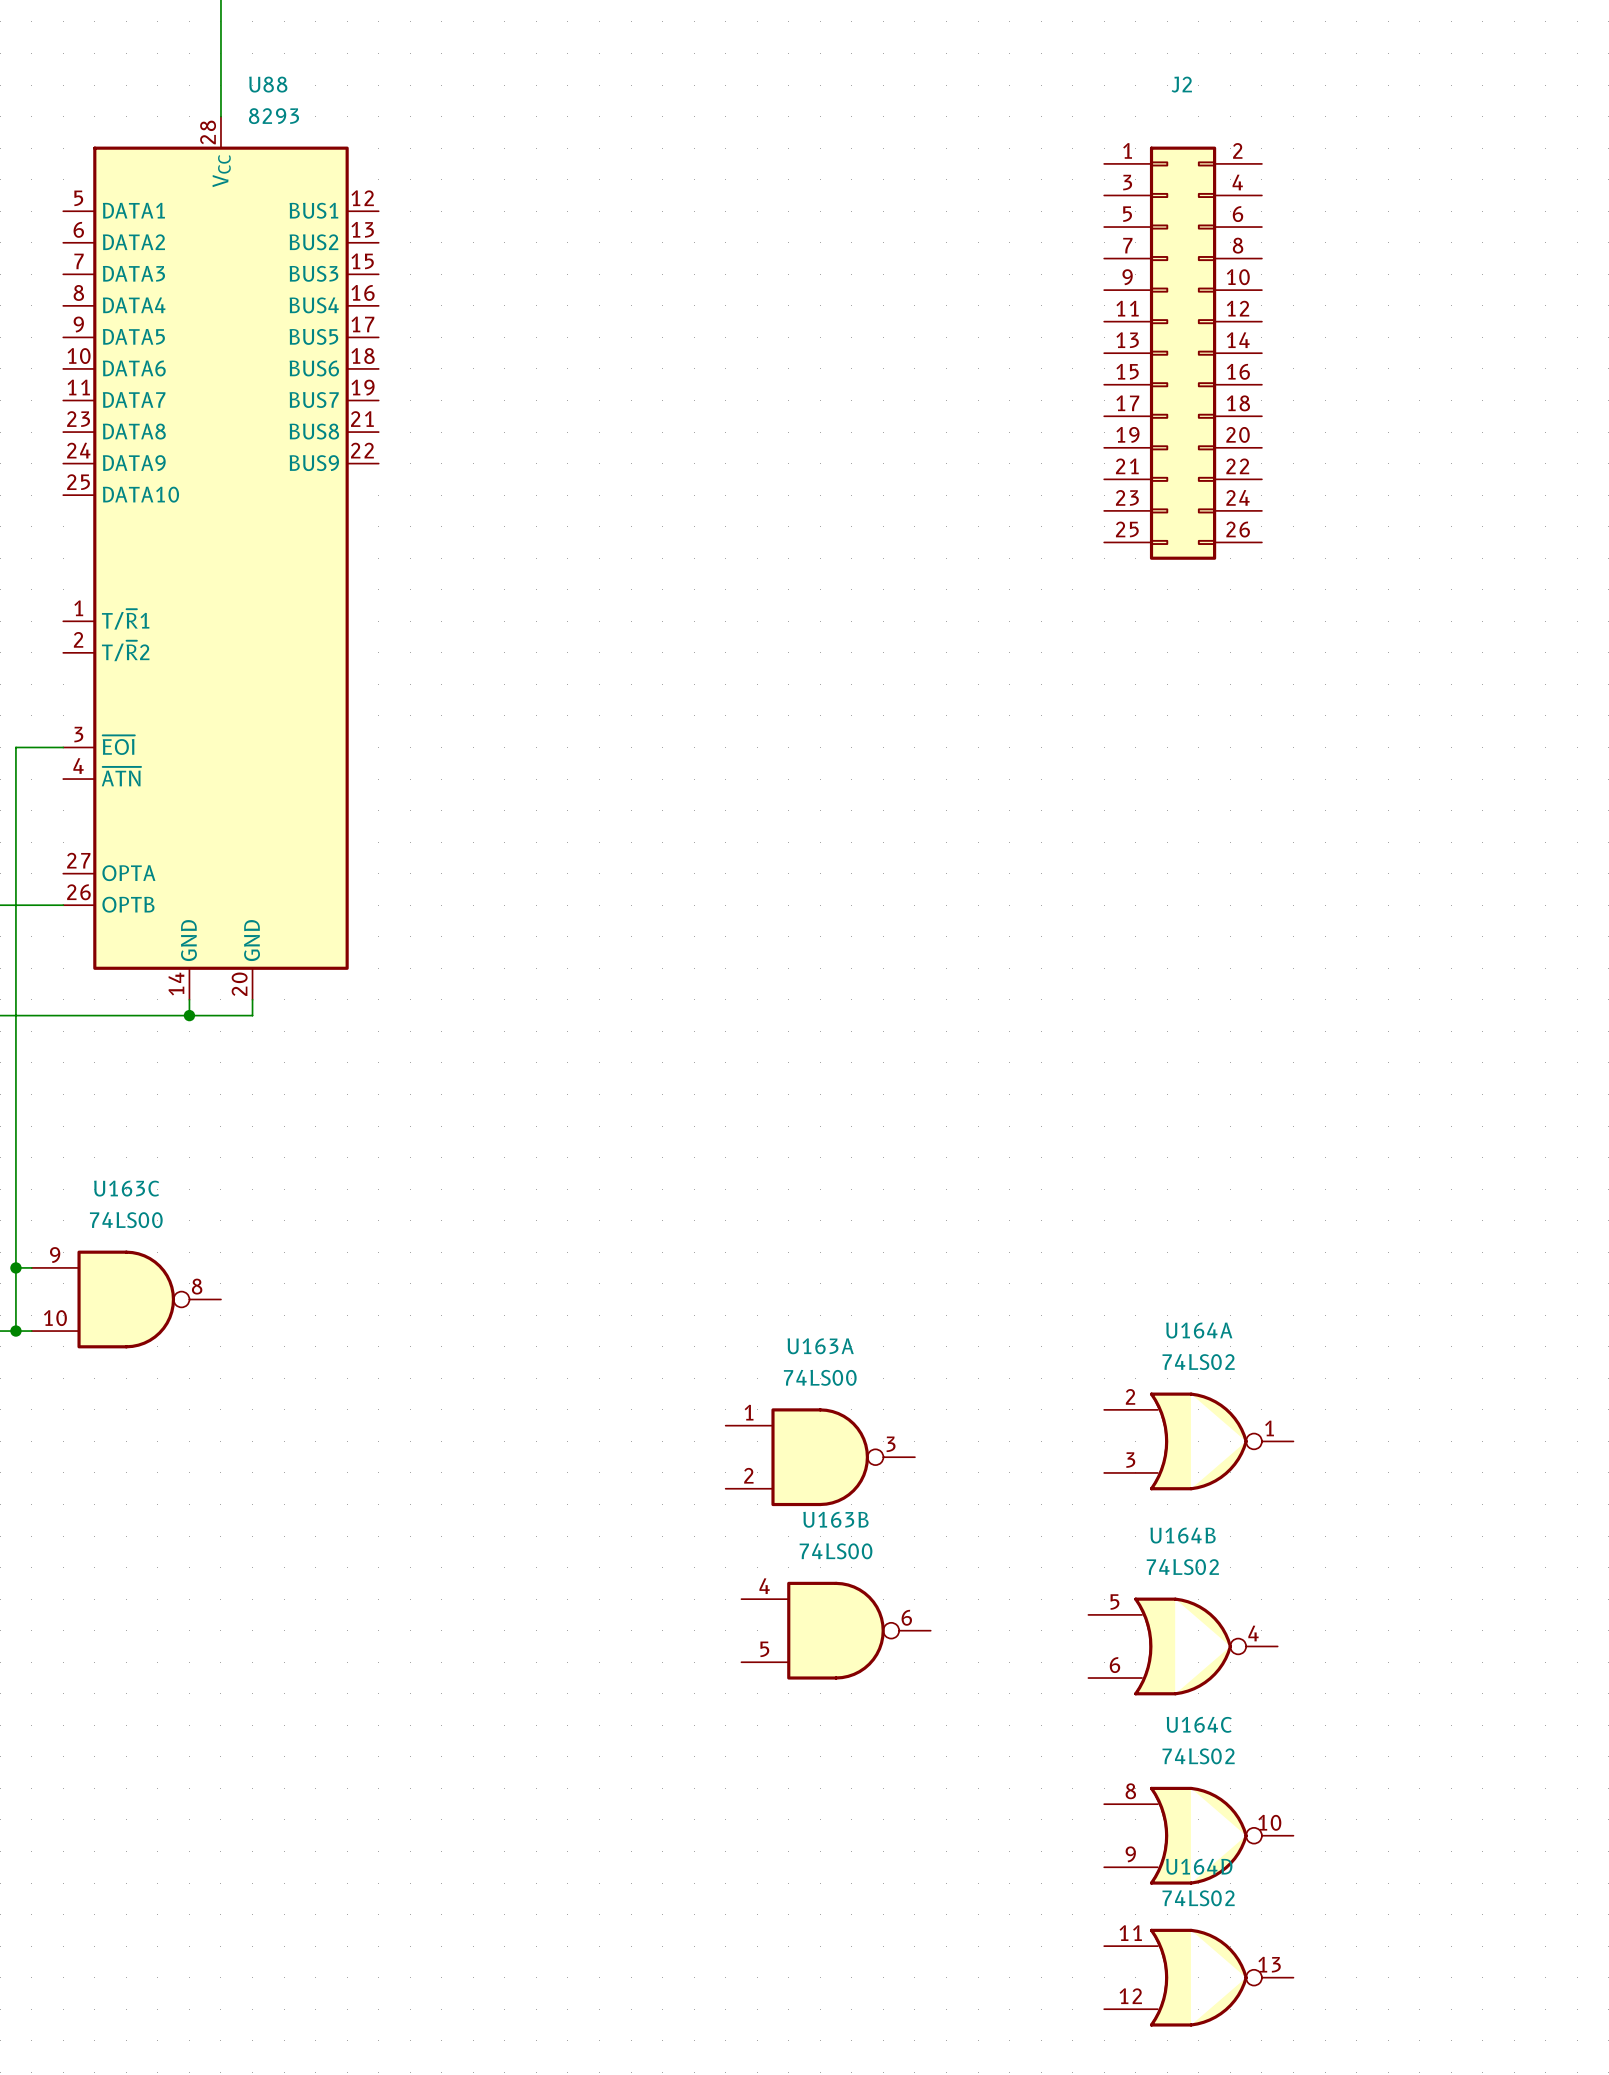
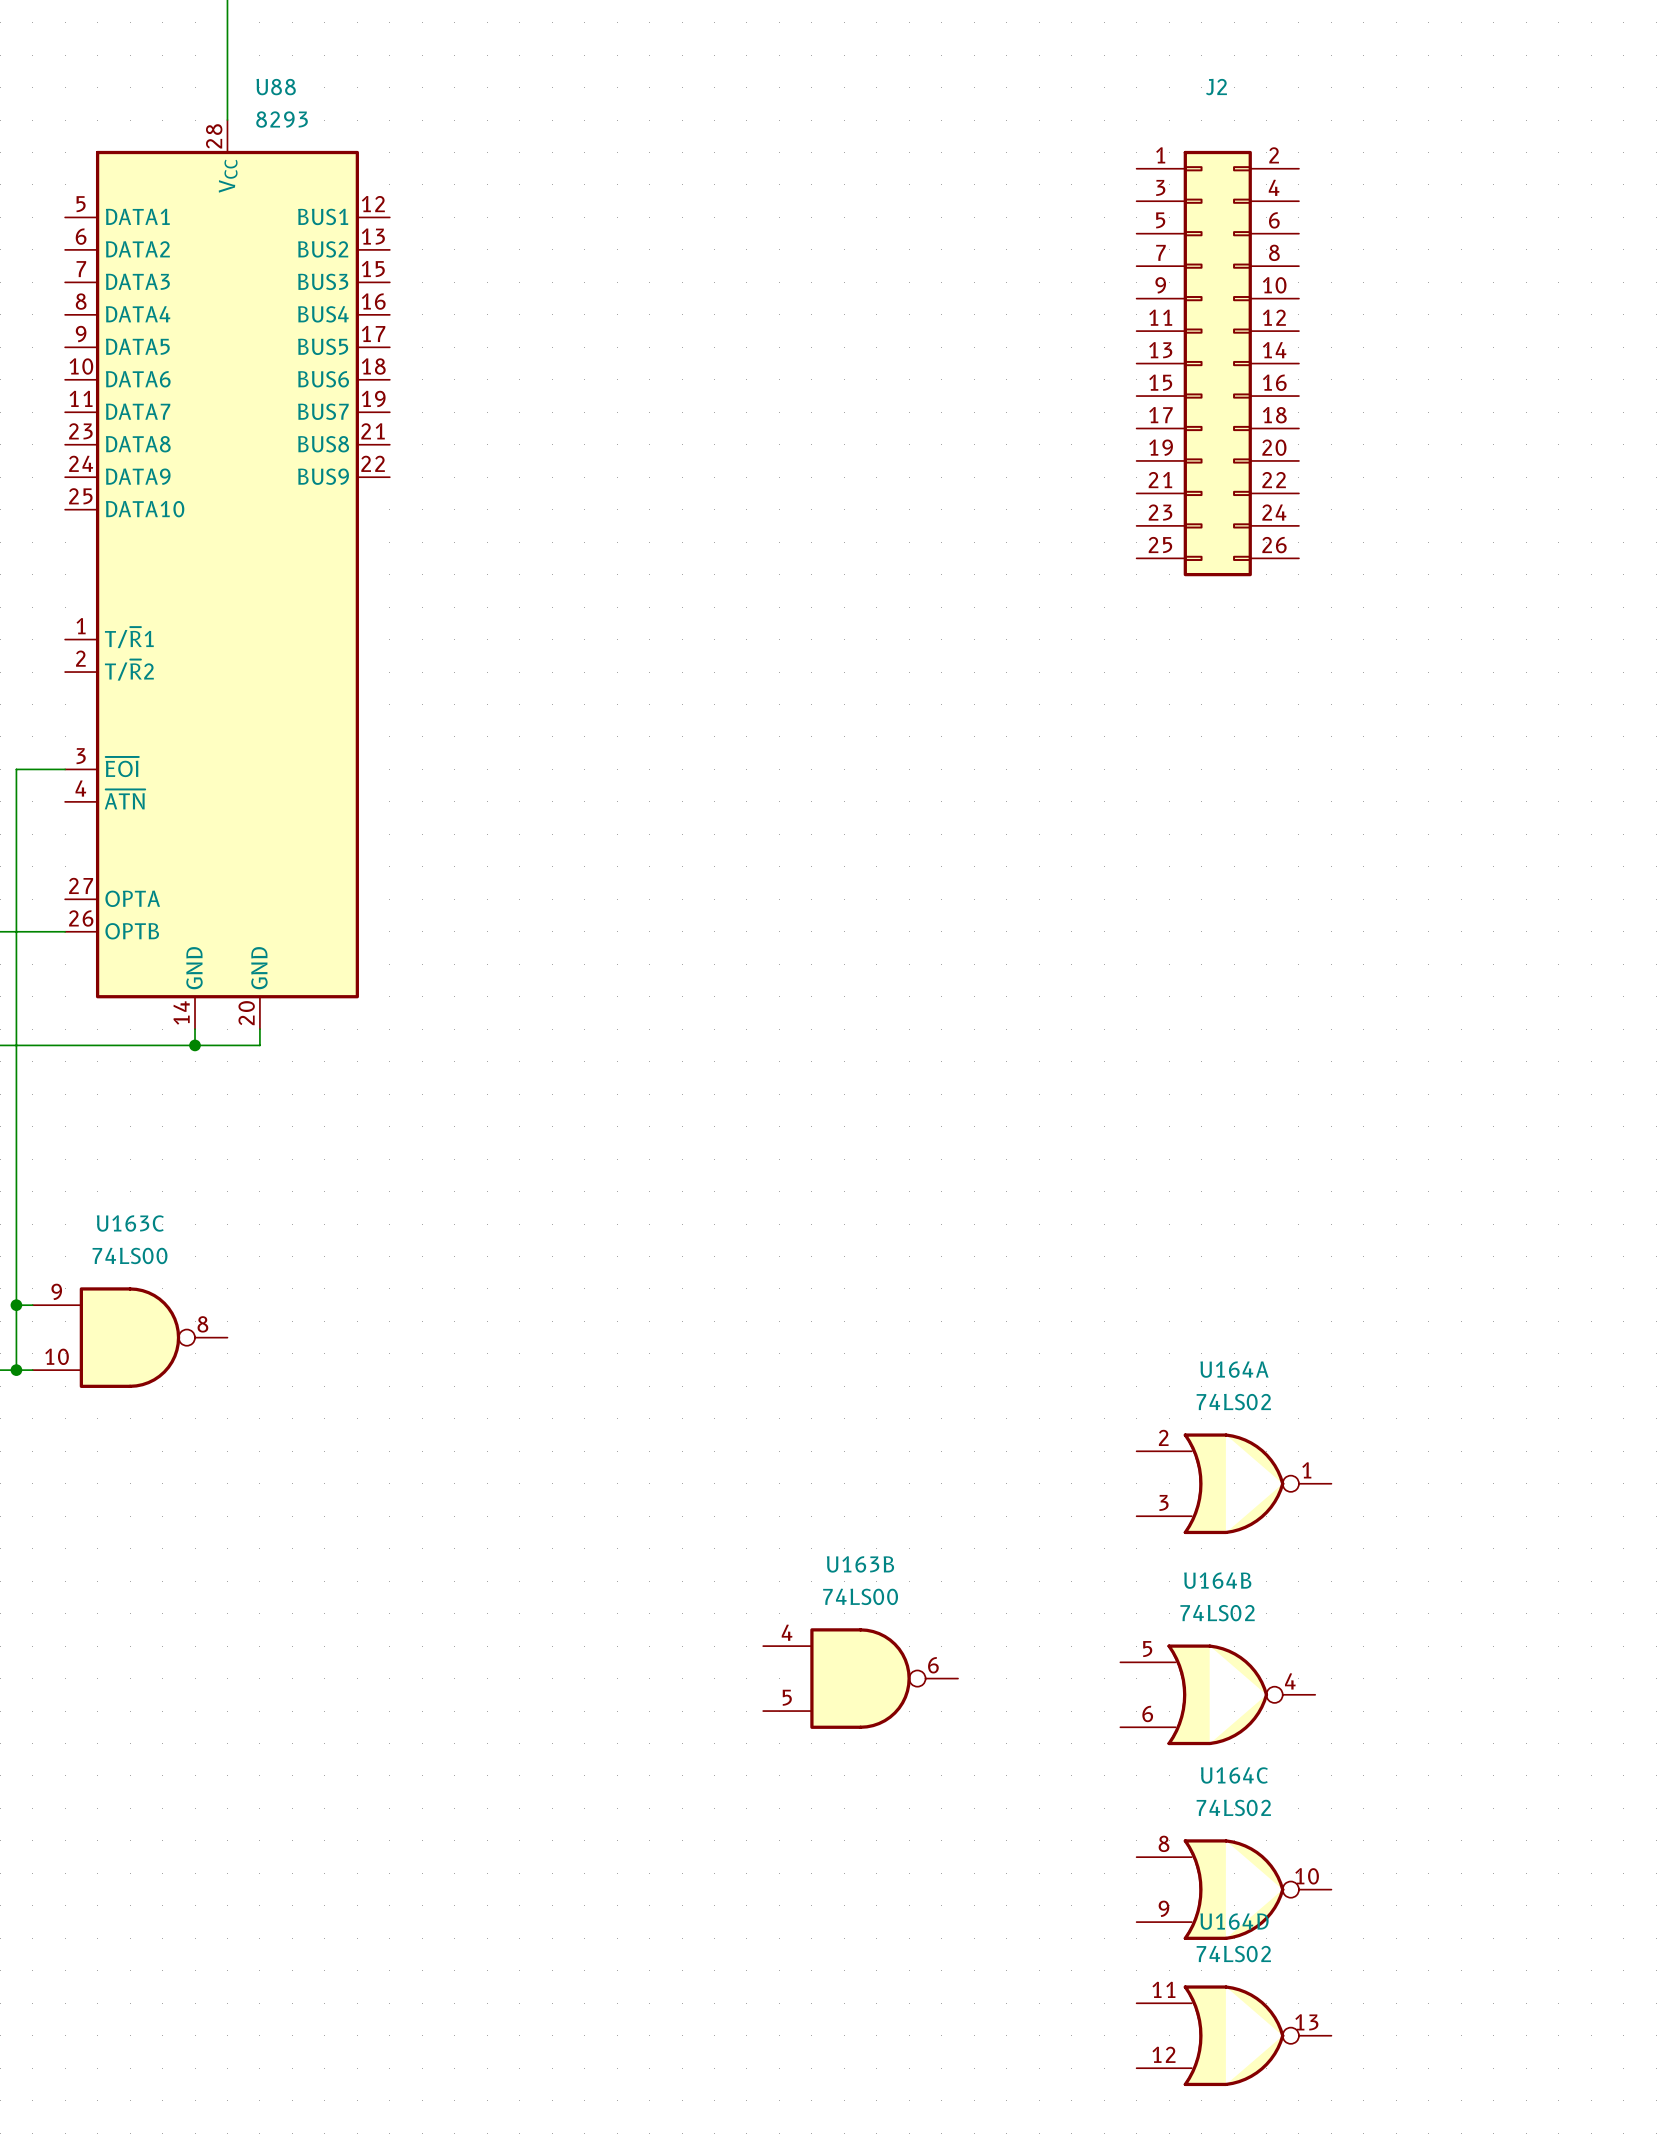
U163A: 74LS00 (820, 1457) -> none

